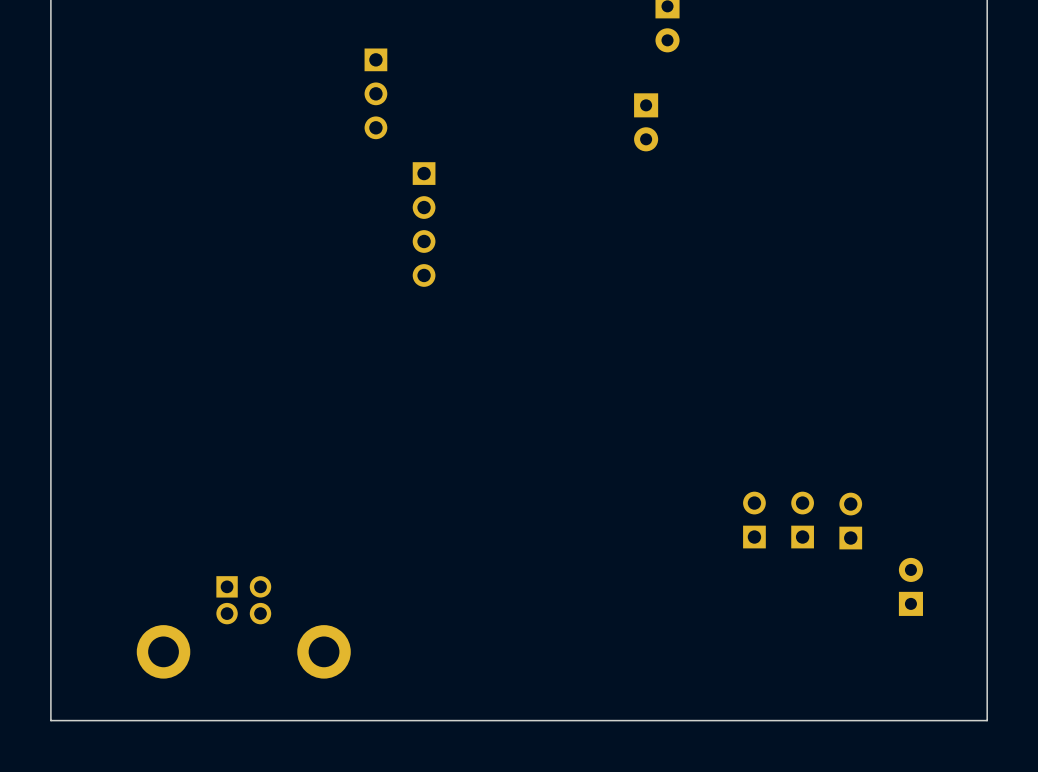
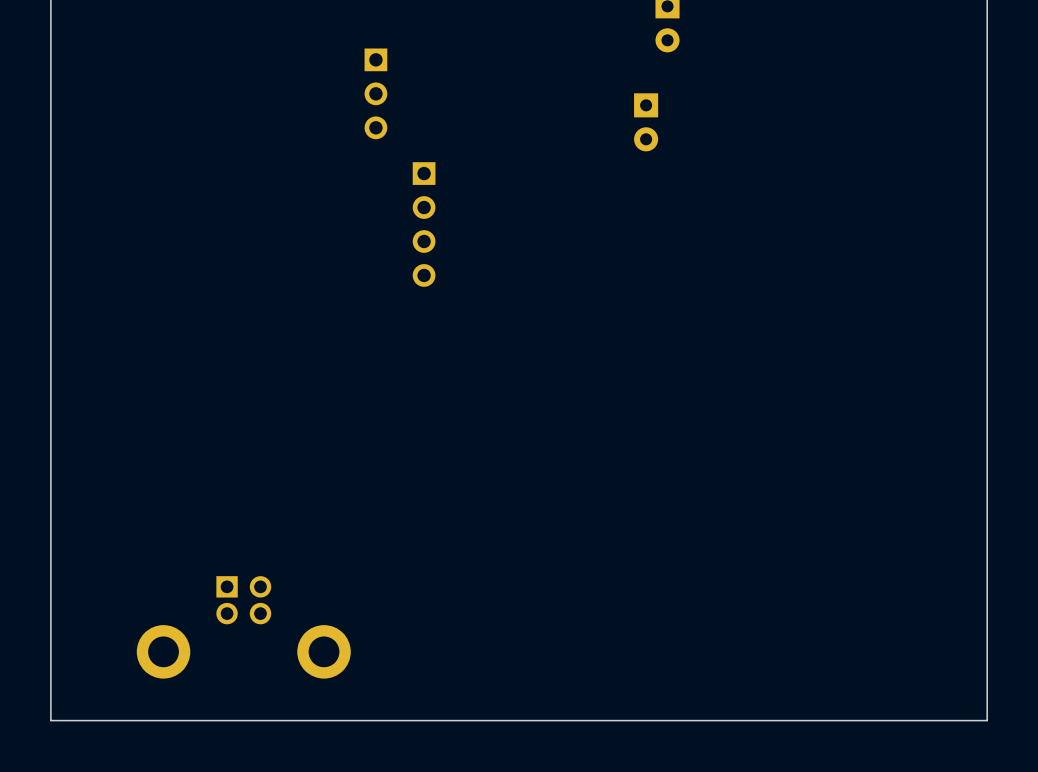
part: (754, 520) -> none
part: (802, 520) -> none
part: (850, 521) -> none
part: (910, 586) -> none

